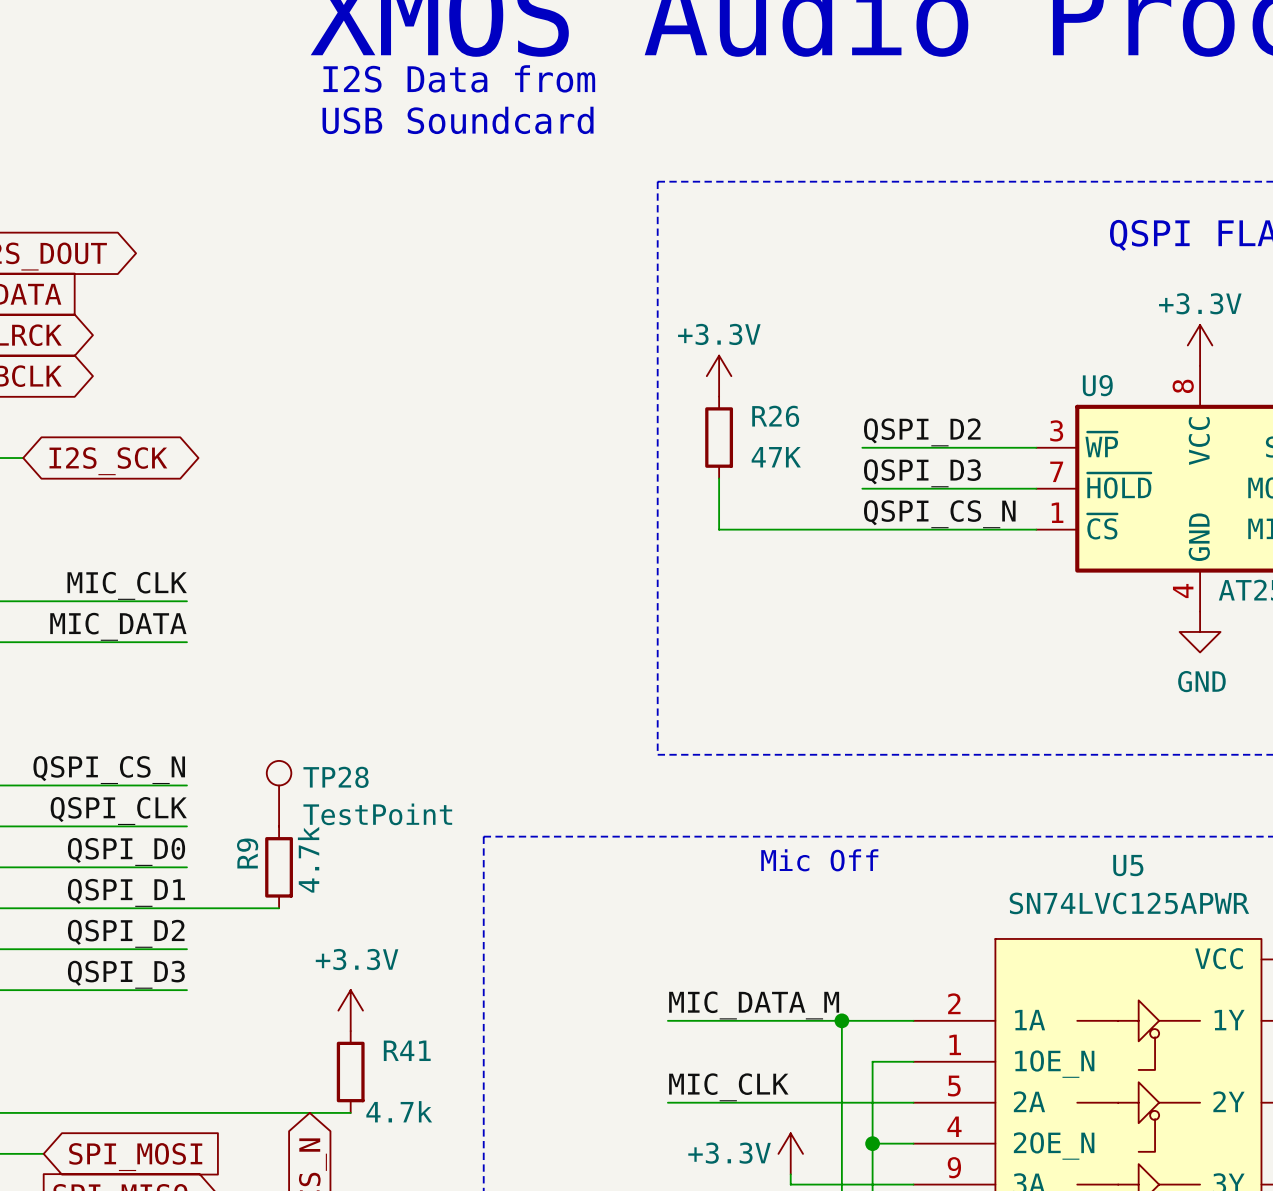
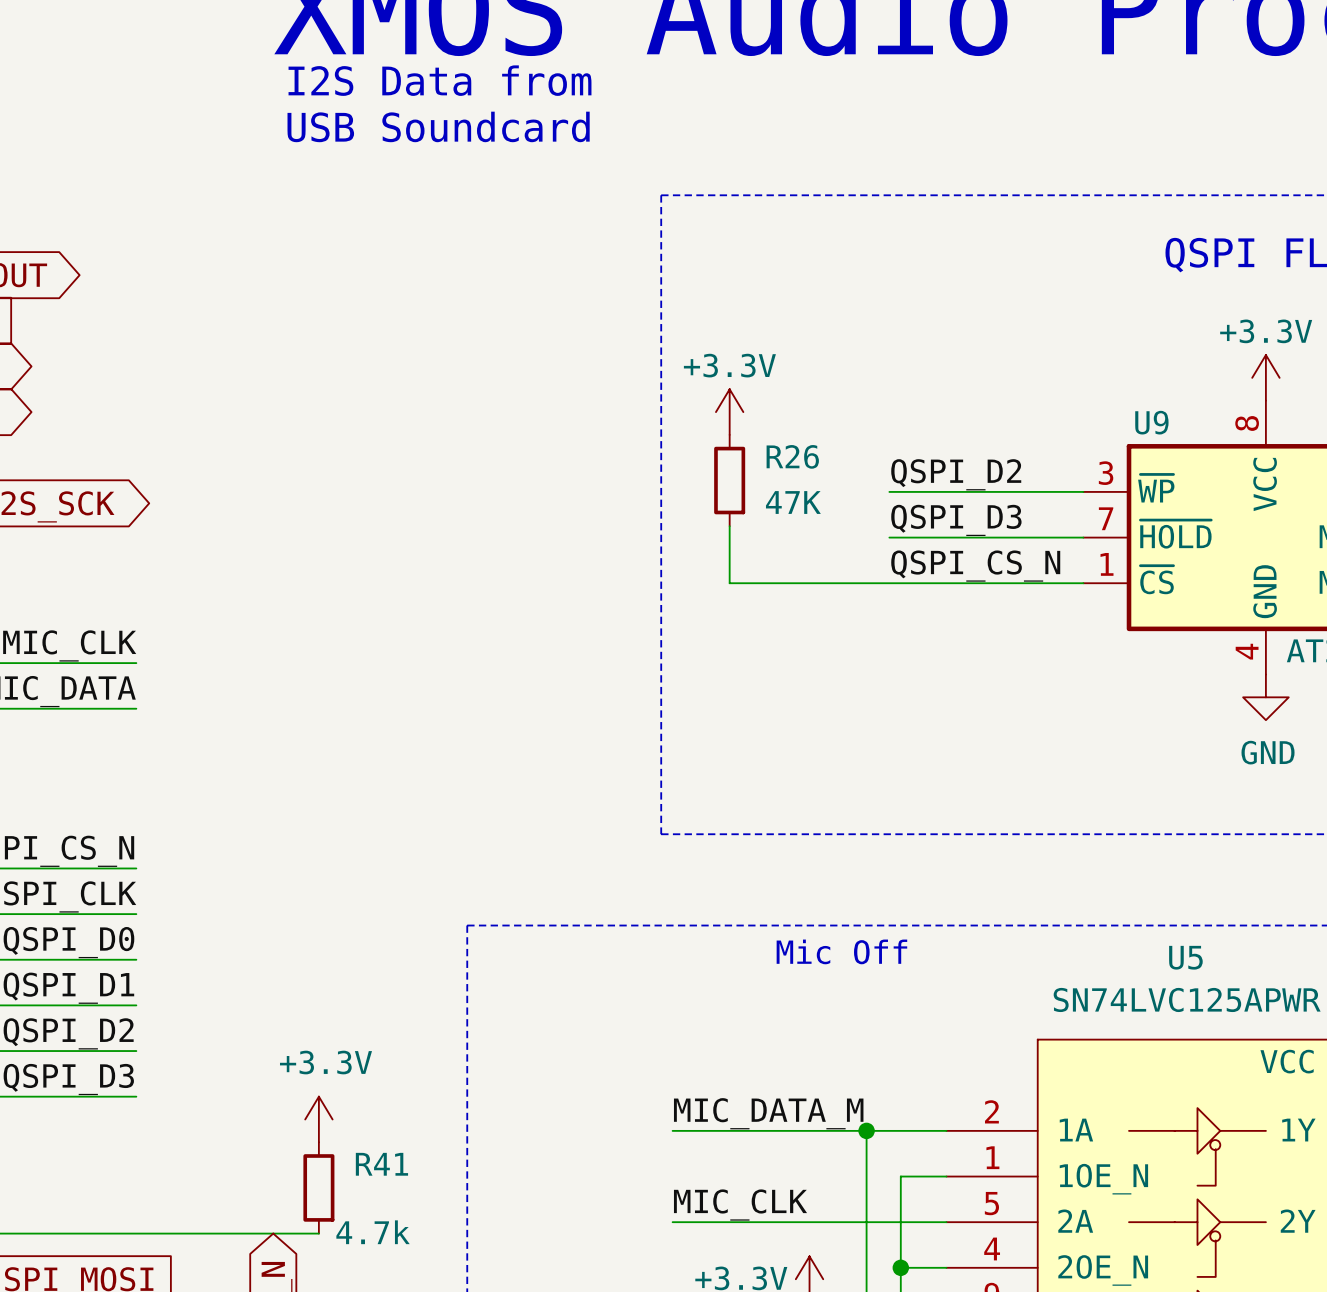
TP28: TestPoint (279, 793) -> none
R9: 4.7k (279, 867) -> none
wire: (186, 908) (279, 908) -> none

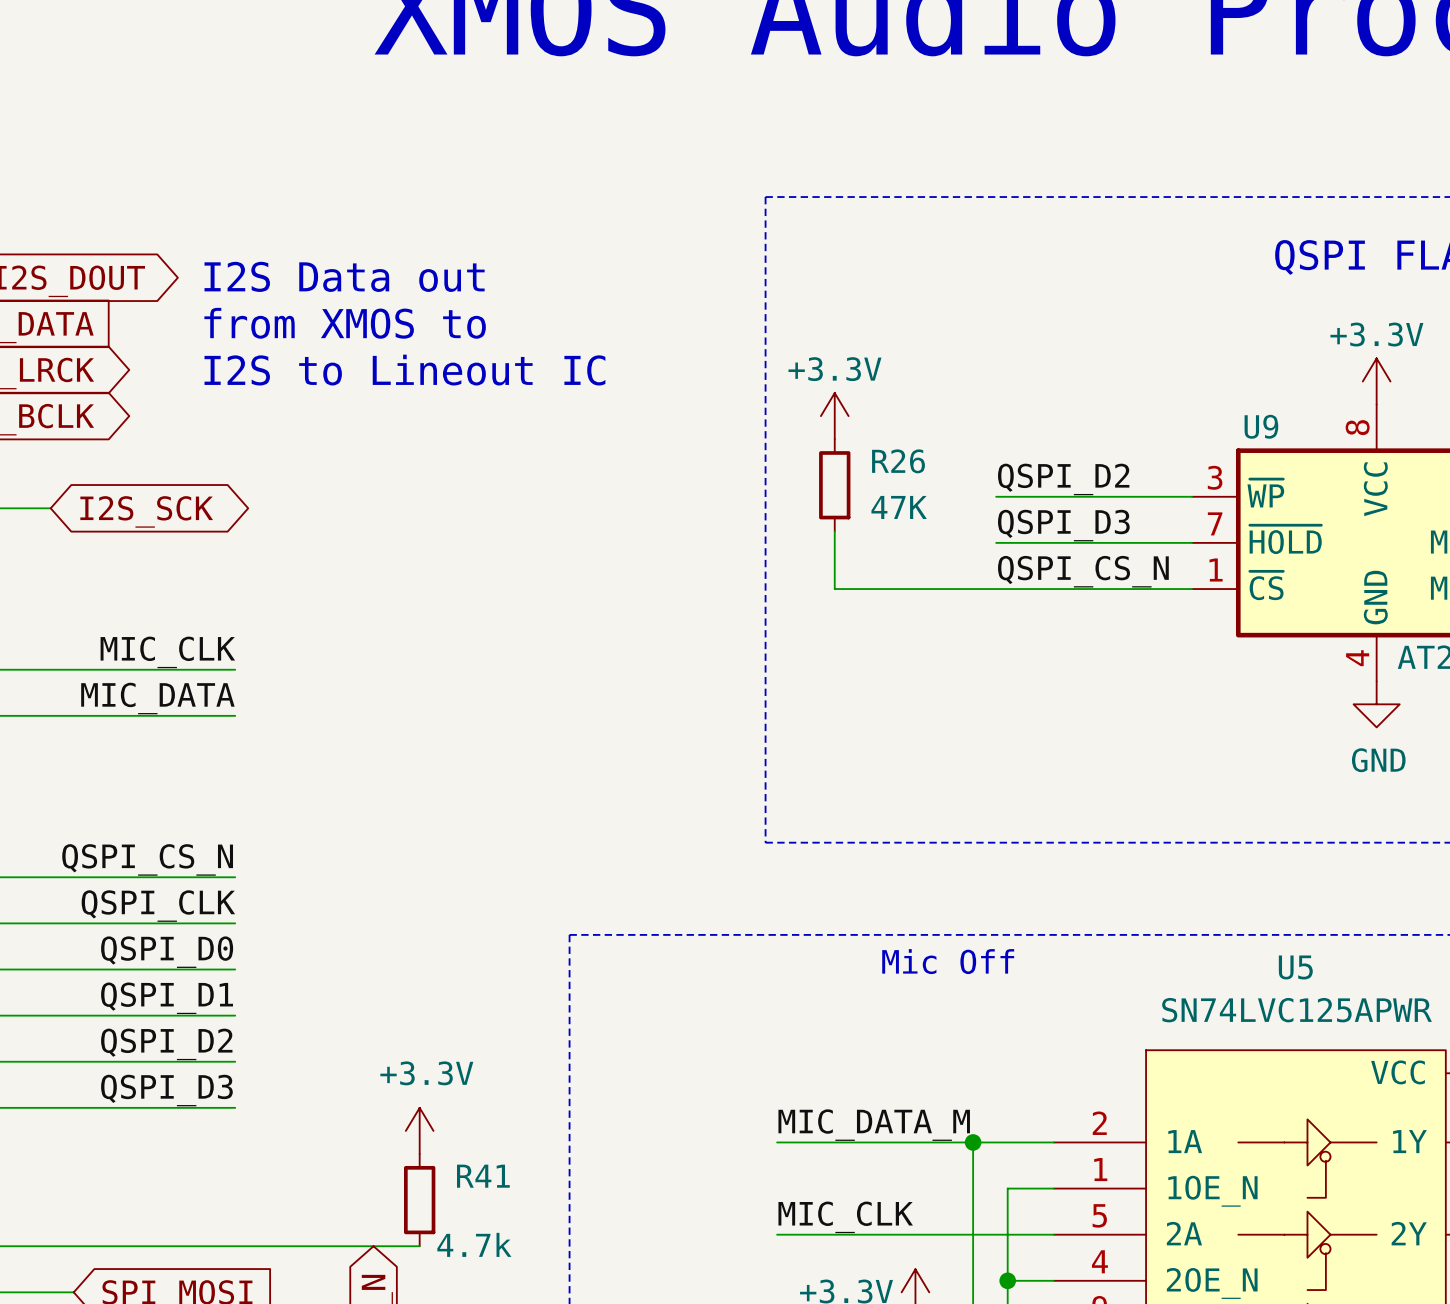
text: I2S Data from (440, 80) -> none
text: USB Soundcard (438, 126) -> none
text: none -> I2S Data out (344, 276)
text: none -> from XMOS to (345, 323)
text: none -> I2S to Lineout IC (404, 370)

